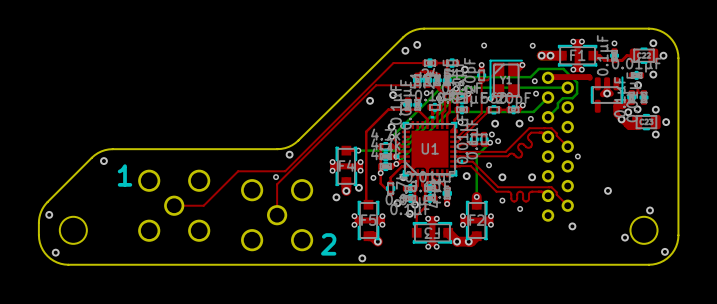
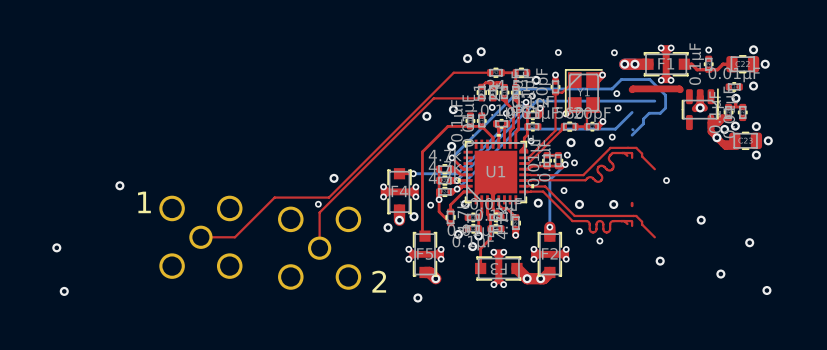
part: (557, 146) -> none
board edge: (38, 235) (39, 217) (43, 206) (97, 153) (112, 149) (277, 149) (288, 146) (298, 140) (406, 34) (412, 30) (424, 28) (648, 28) (656, 29) (666, 34) (674, 43) (678, 58) (678, 235) -> none
part: (358, 241) -> none

